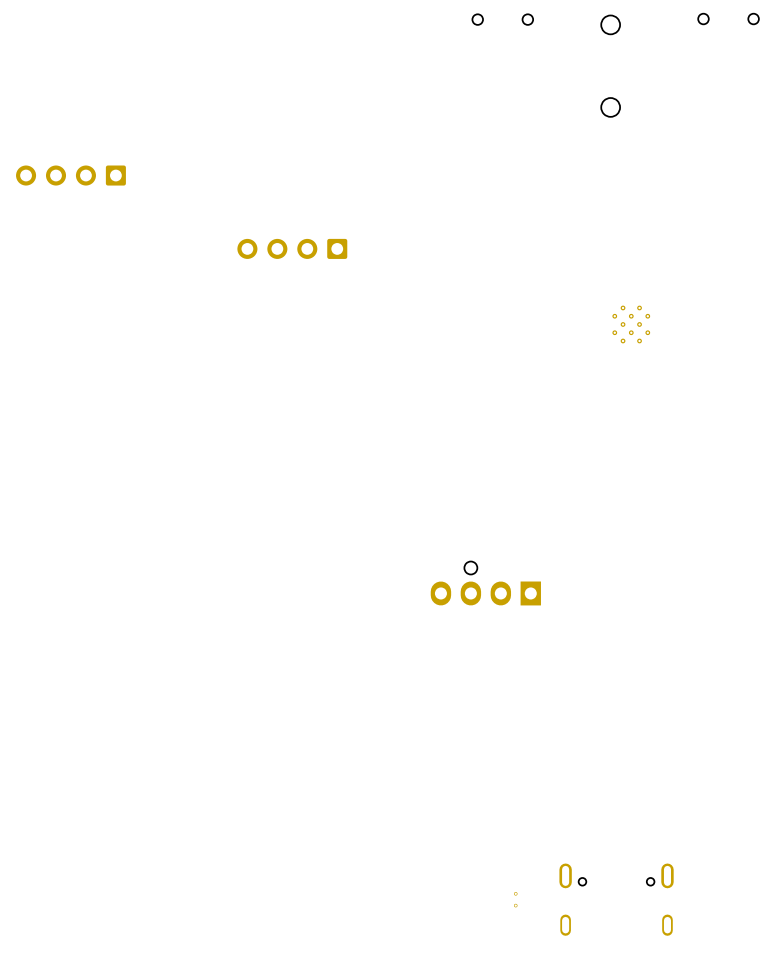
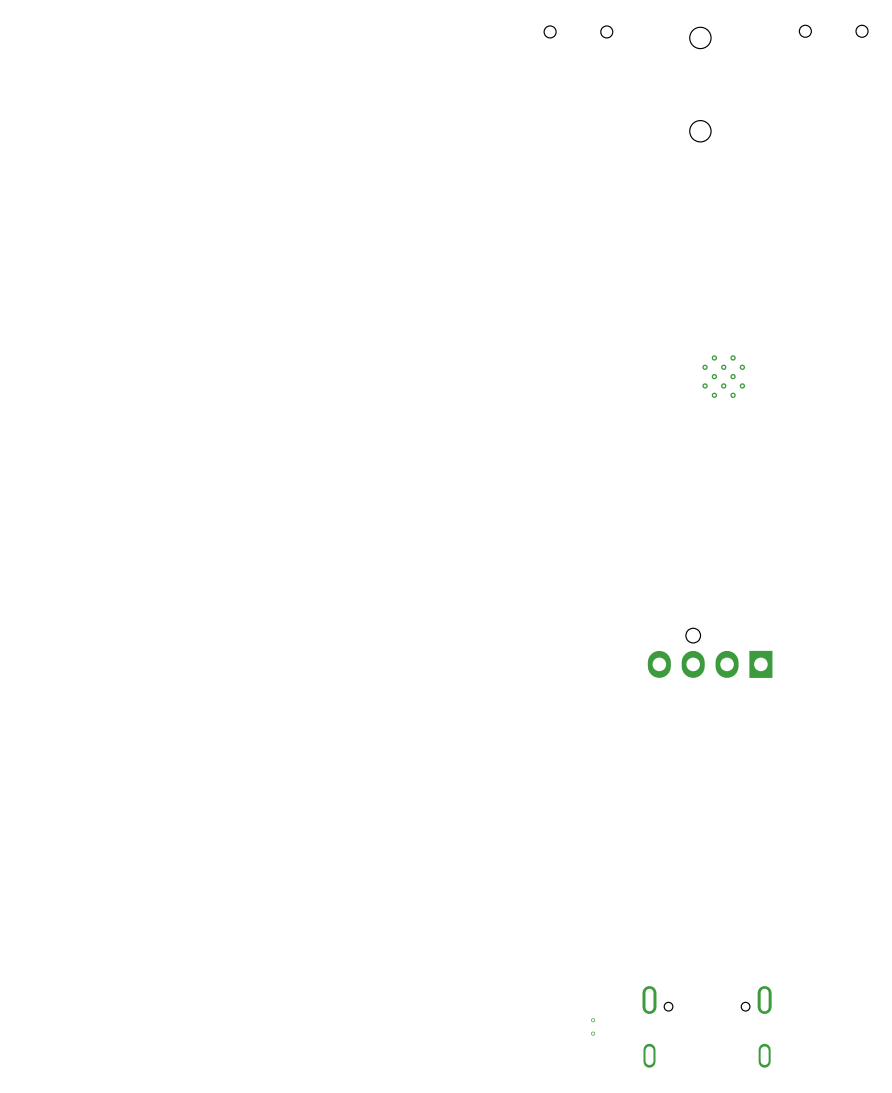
part: (70, 175) -> none
part: (292, 248) -> none
part position: (485, 583) -> (710, 653)

